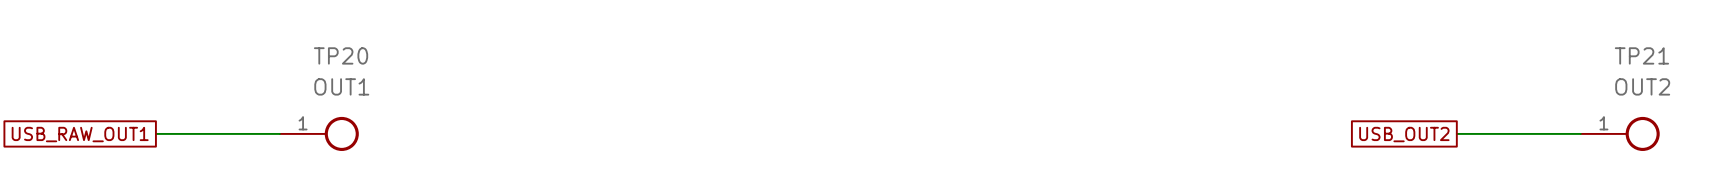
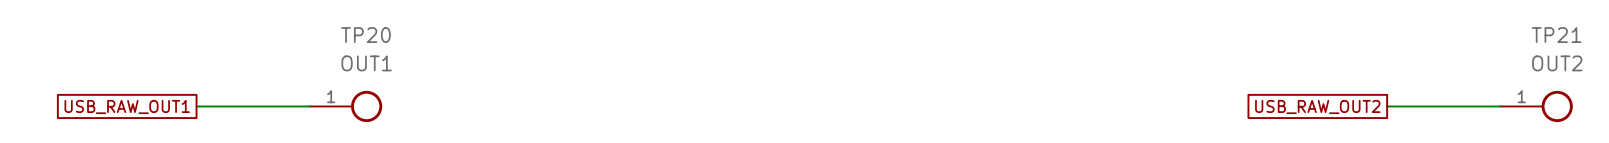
global label: USB_OUT2 (1404, 134) -> USB_RAW_OUT2 (1317, 107)

